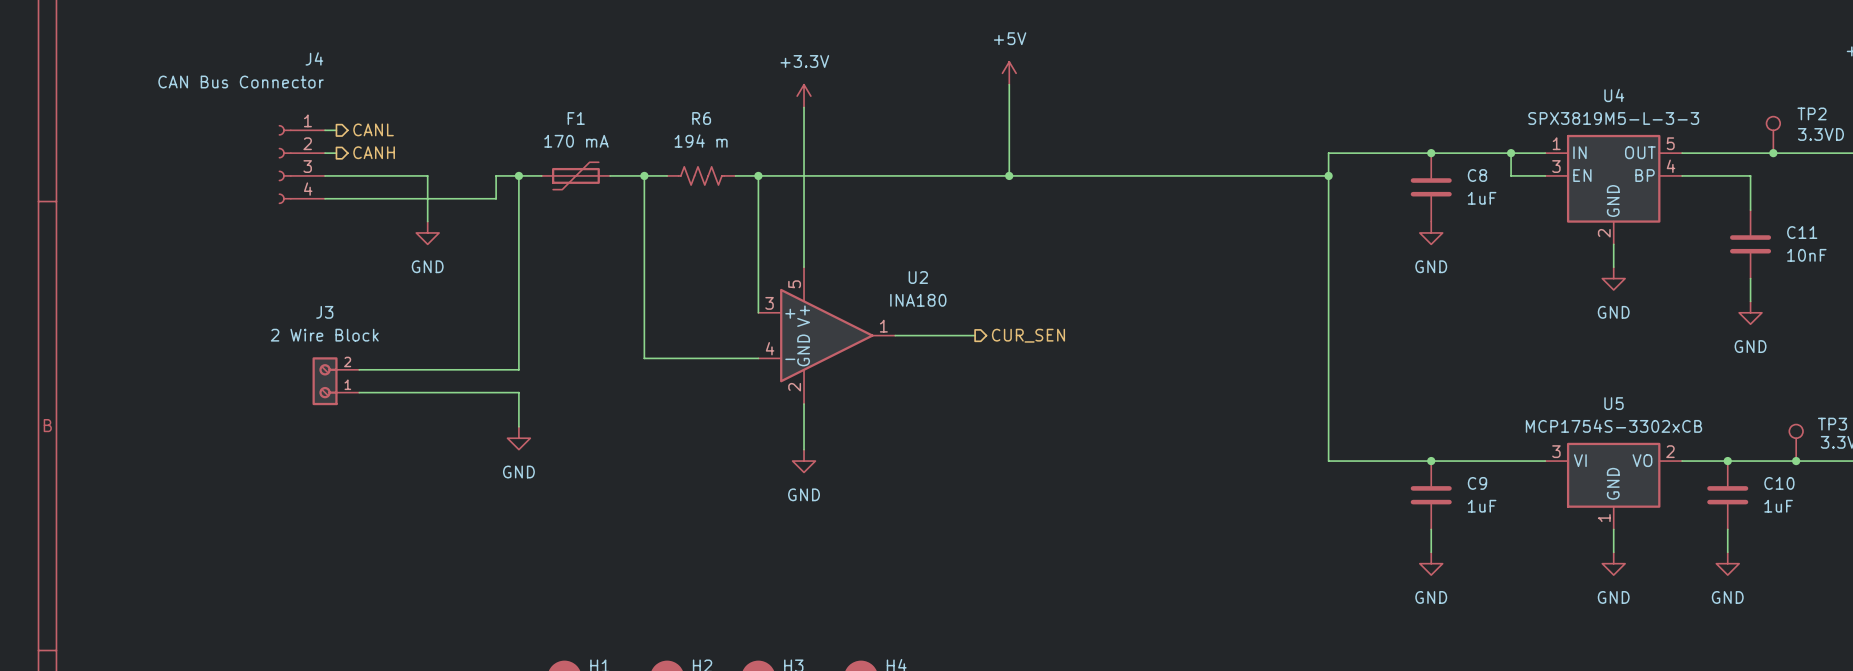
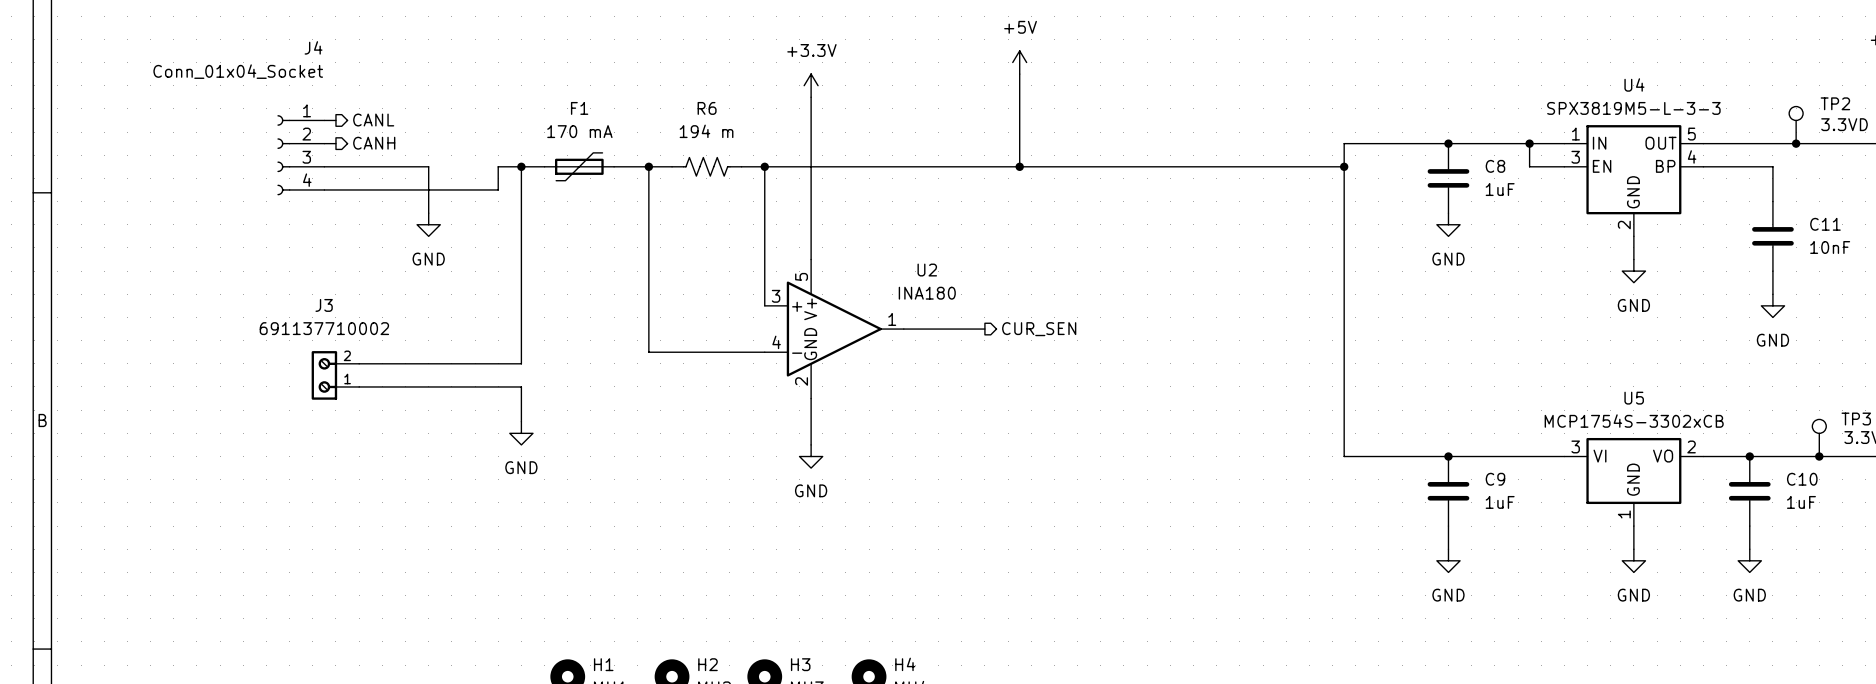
J4 value: CAN Bus Connector (241, 82) -> Conn_01x04_Socket (238, 71)
J3 value: 2 Wire Block (324, 335) -> 691137710002 (324, 328)

